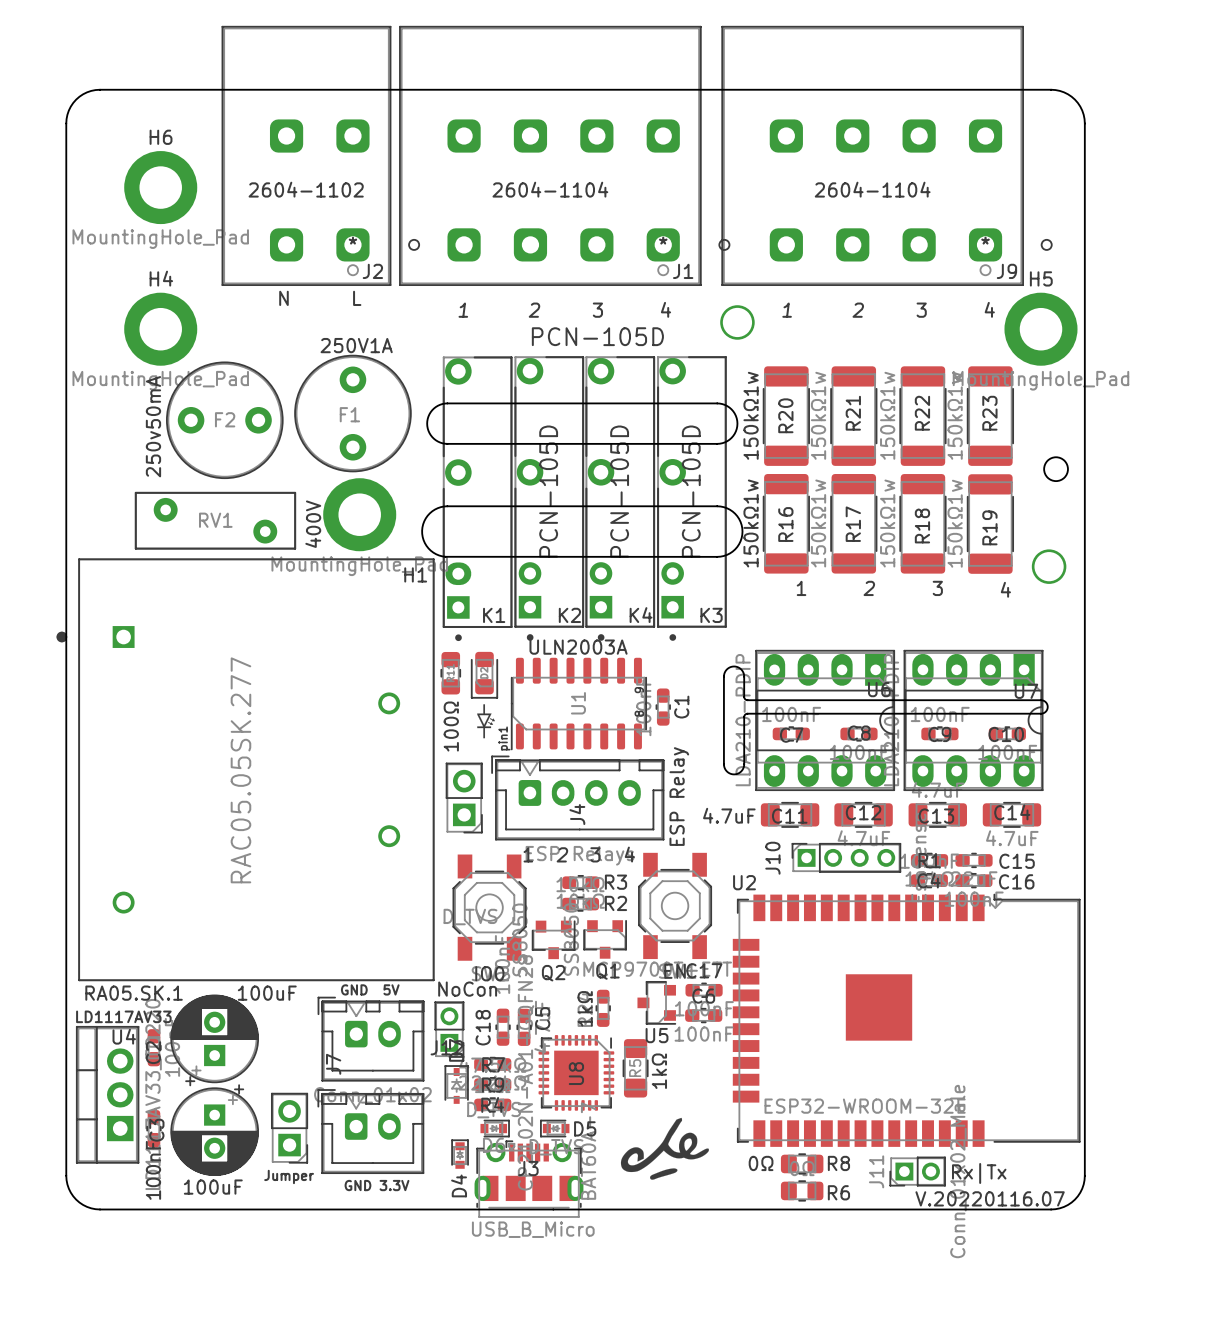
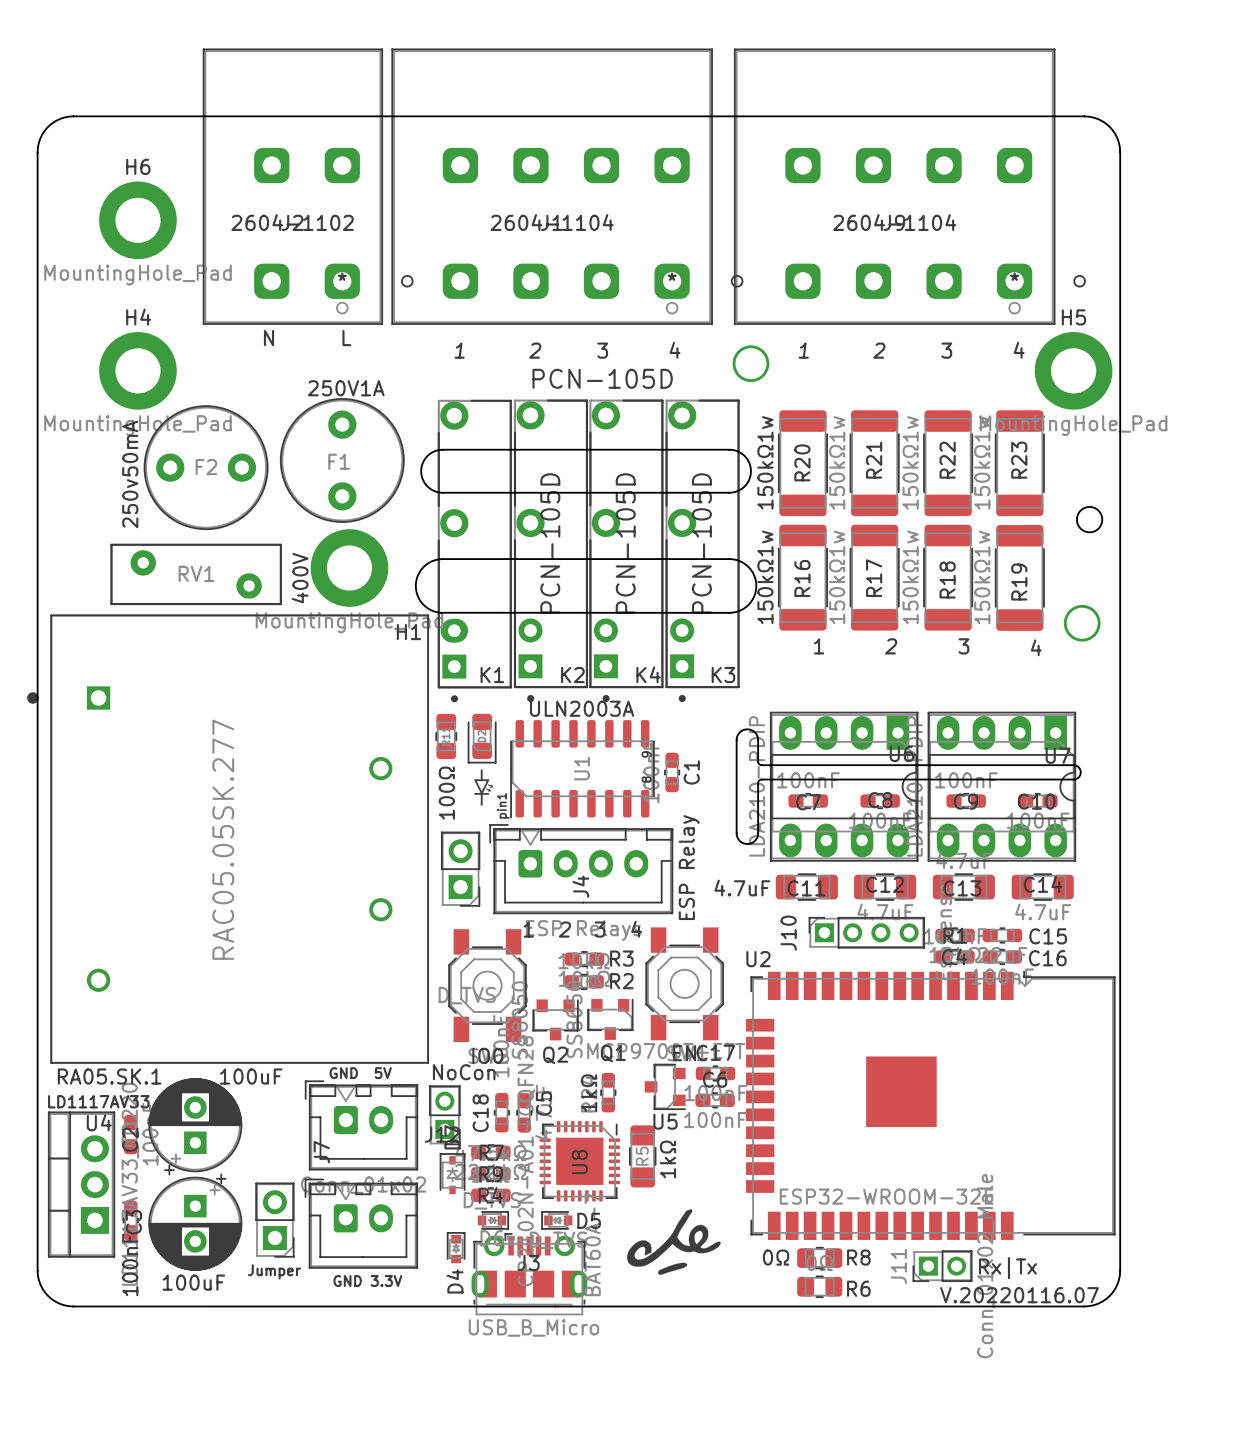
J2 name position: J2 (372, 271) -> J2 (292, 222)
J1 name position: J1 (683, 271) -> J1 (551, 222)
J9 name position: J9 (1006, 271) -> J9 (894, 222)

